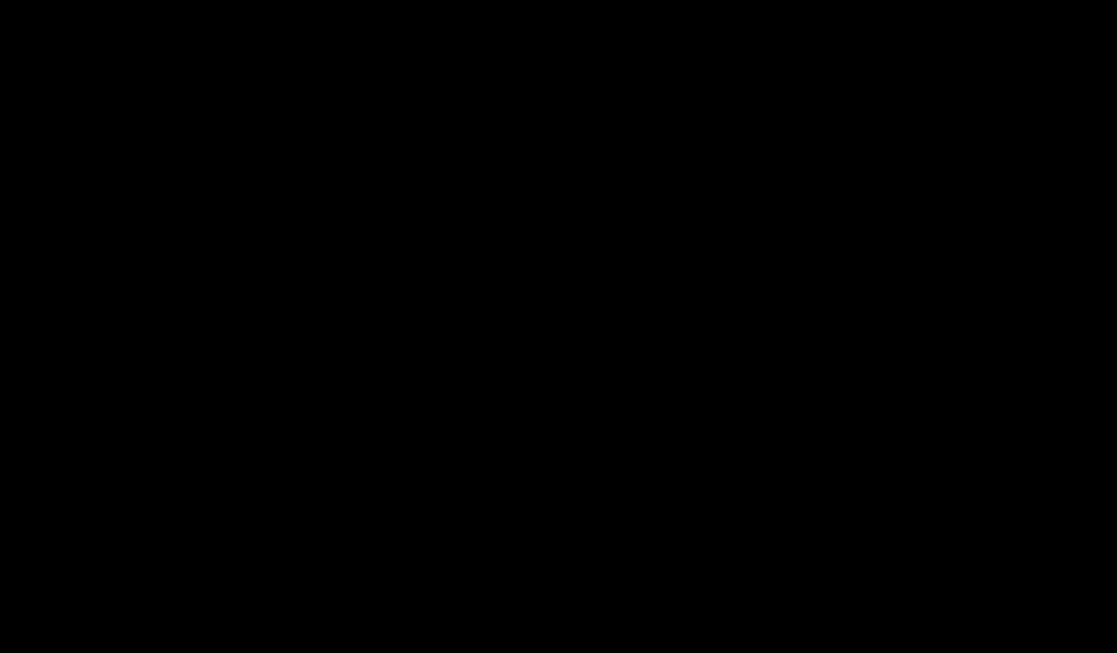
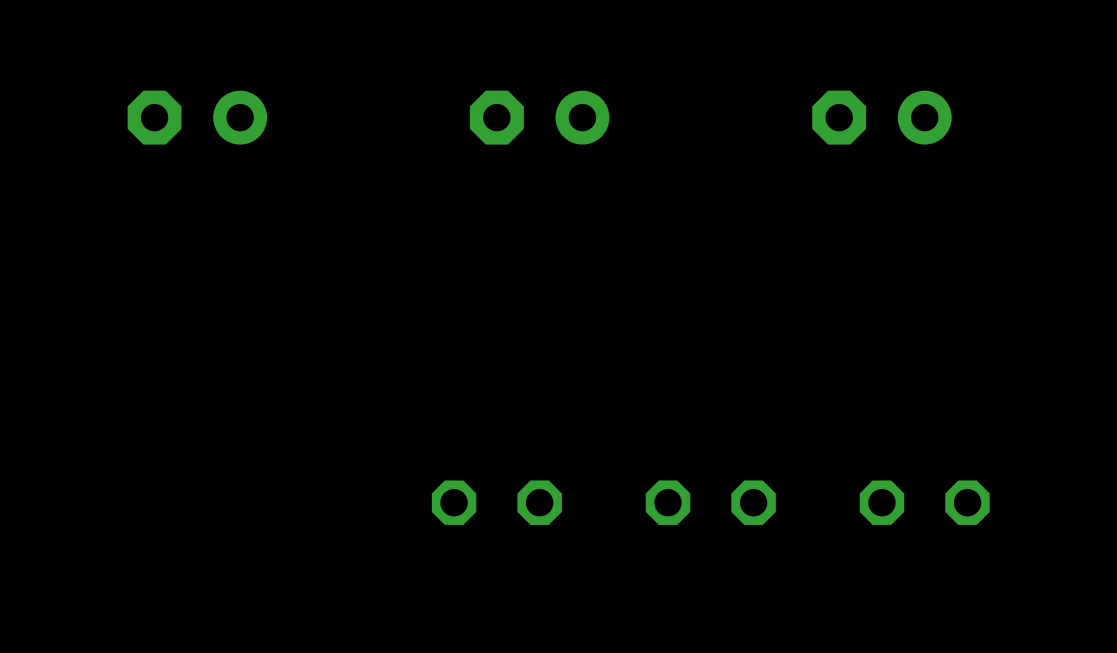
part: none -> (197, 117)
part: none -> (539, 117)
part: none -> (881, 117)
part: none -> (496, 502)
part: none -> (710, 502)
part: none -> (924, 502)

